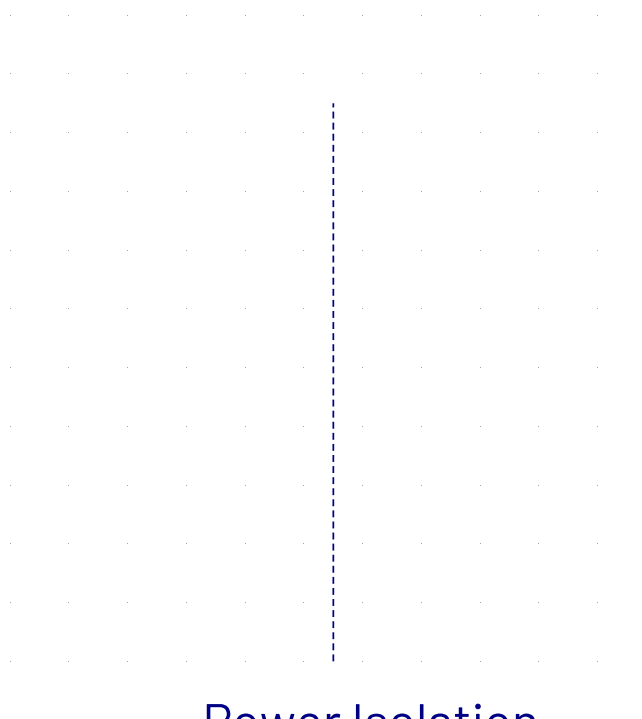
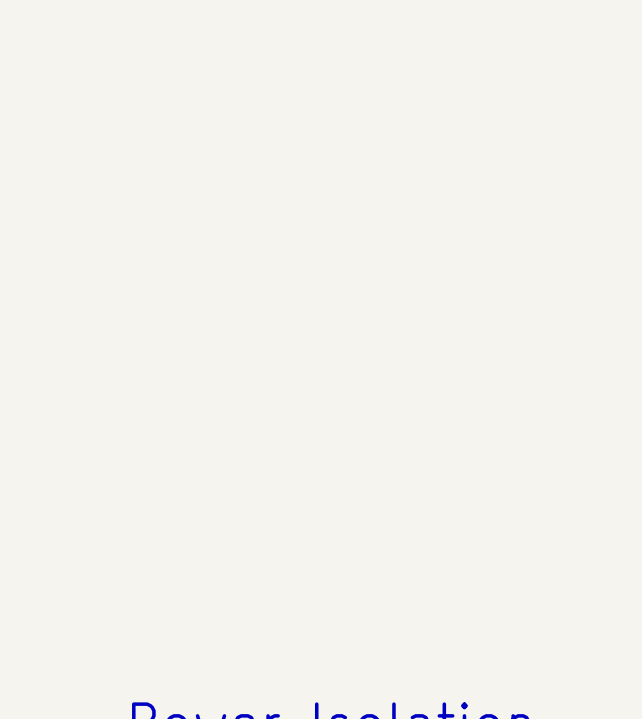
line: (333, 103) (333, 661) -> none

